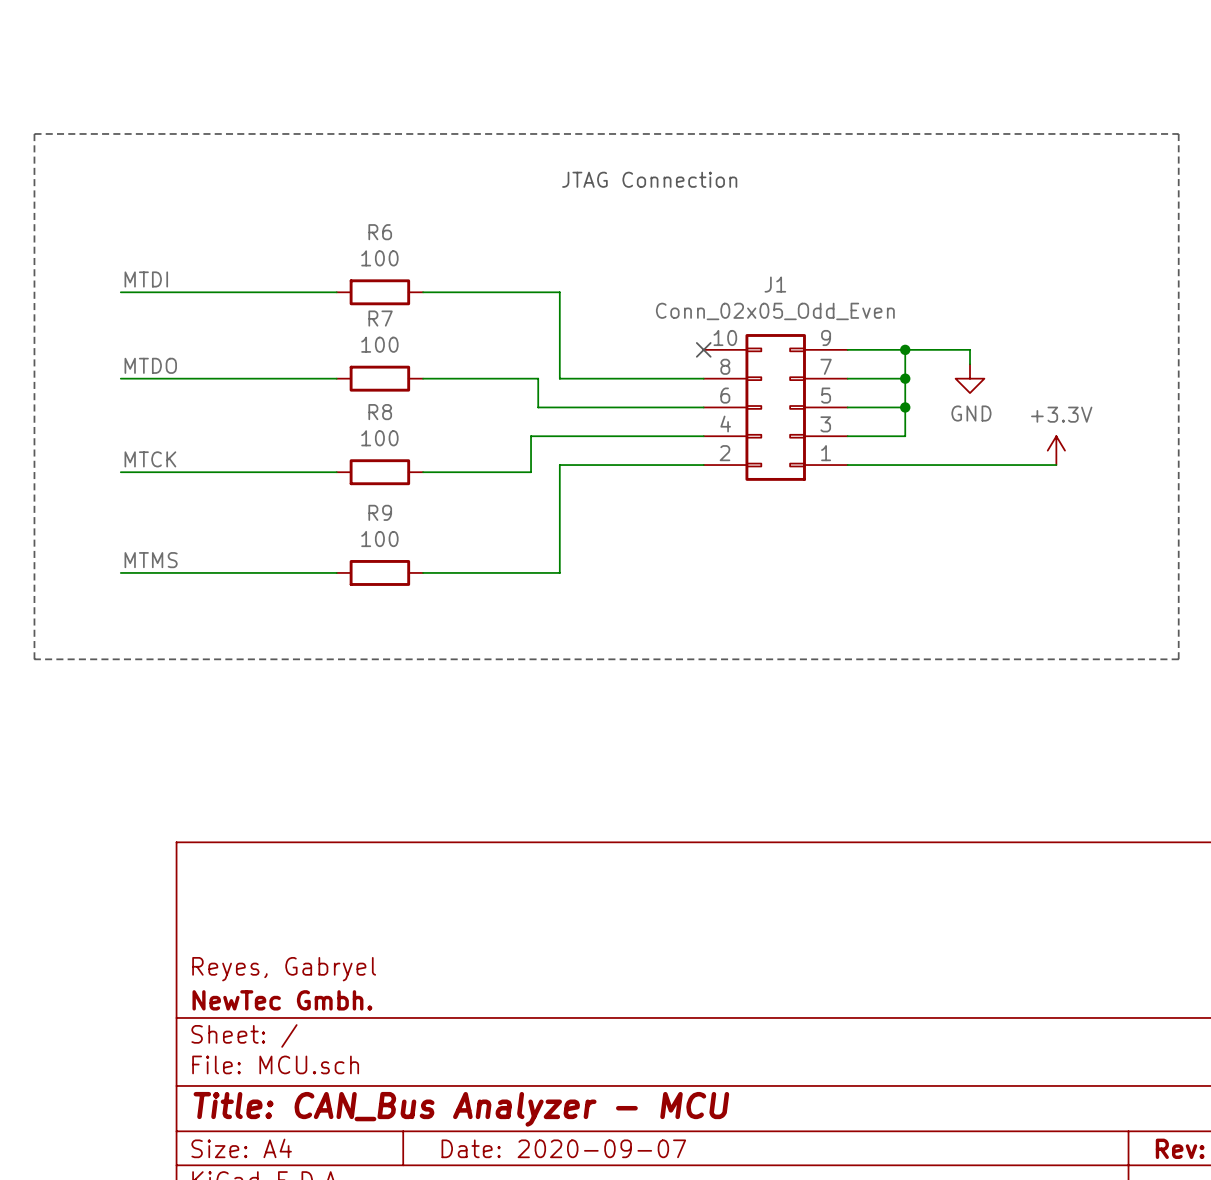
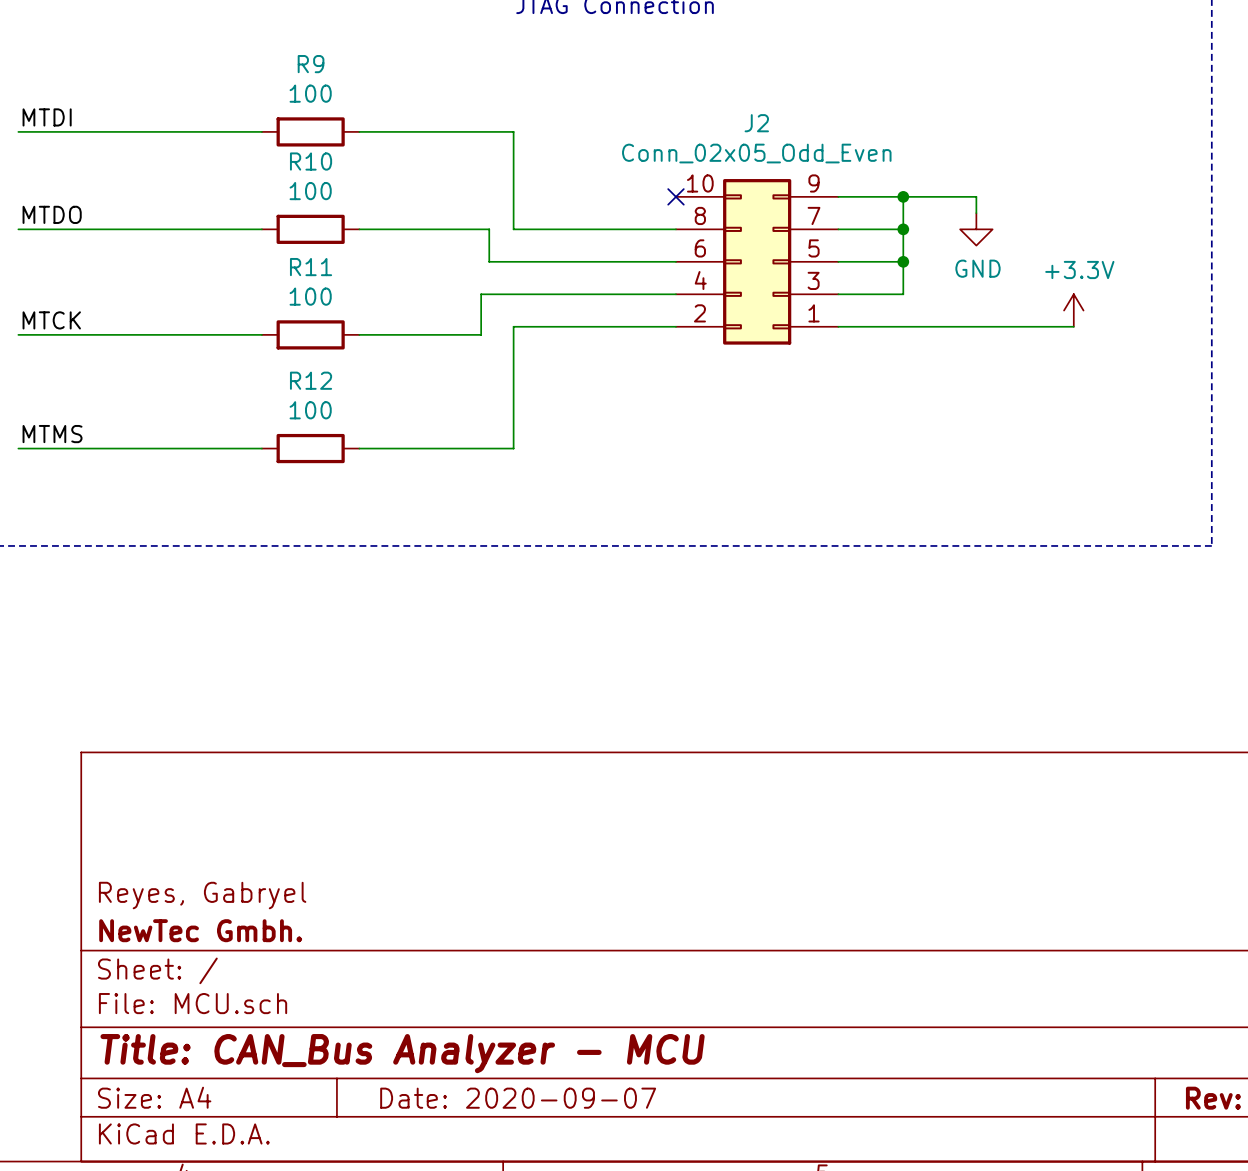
R6 name: R6 (380, 232) -> R9 (311, 64)
J1 name: J1 (775, 284) -> J2 (756, 123)
R7 name: R7 (380, 318) -> R10 (311, 161)
R8 name: R8 (380, 412) -> R11 (311, 267)
R9 name: R9 (380, 512) -> R12 (311, 380)

